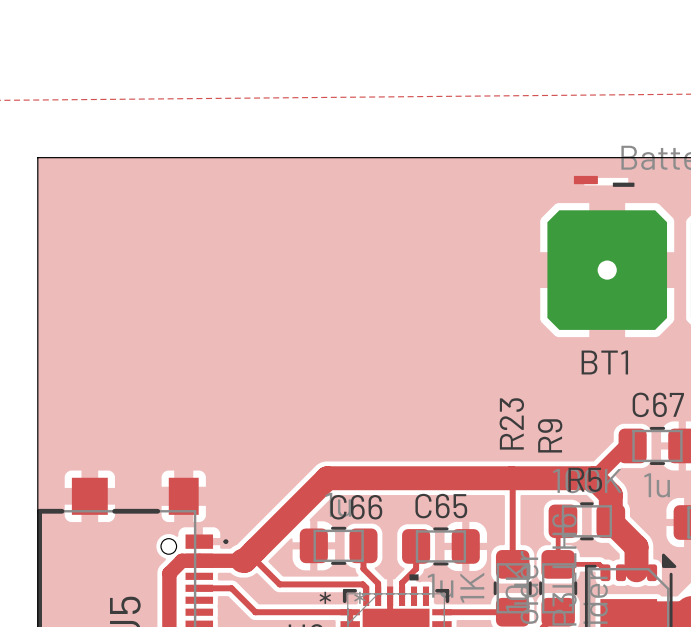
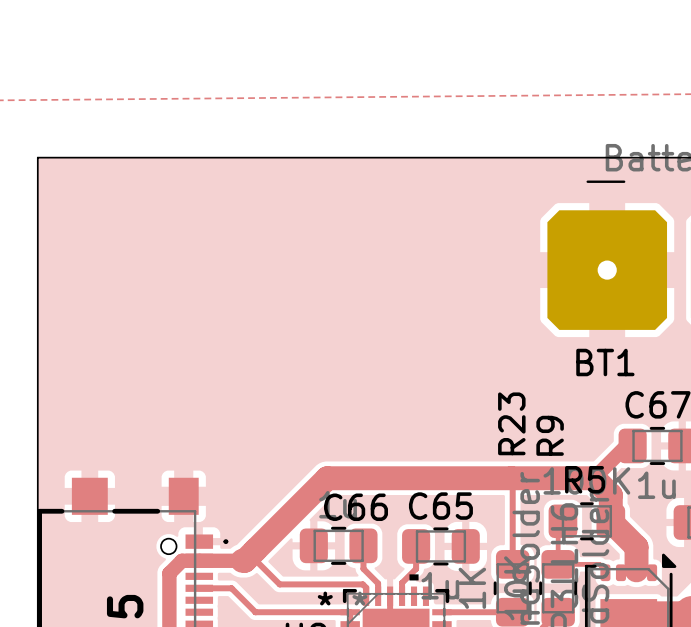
text: - (585, 180) -> none

